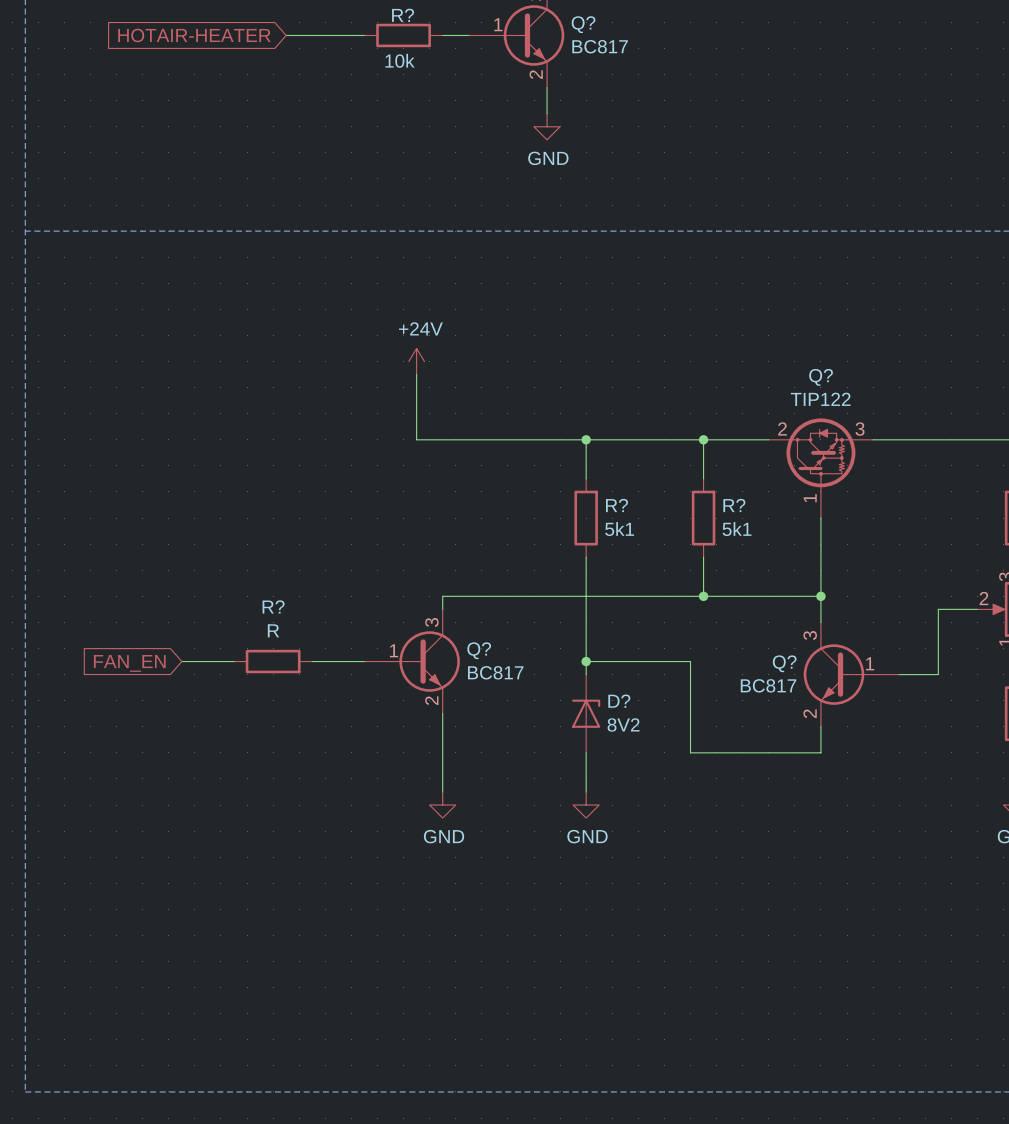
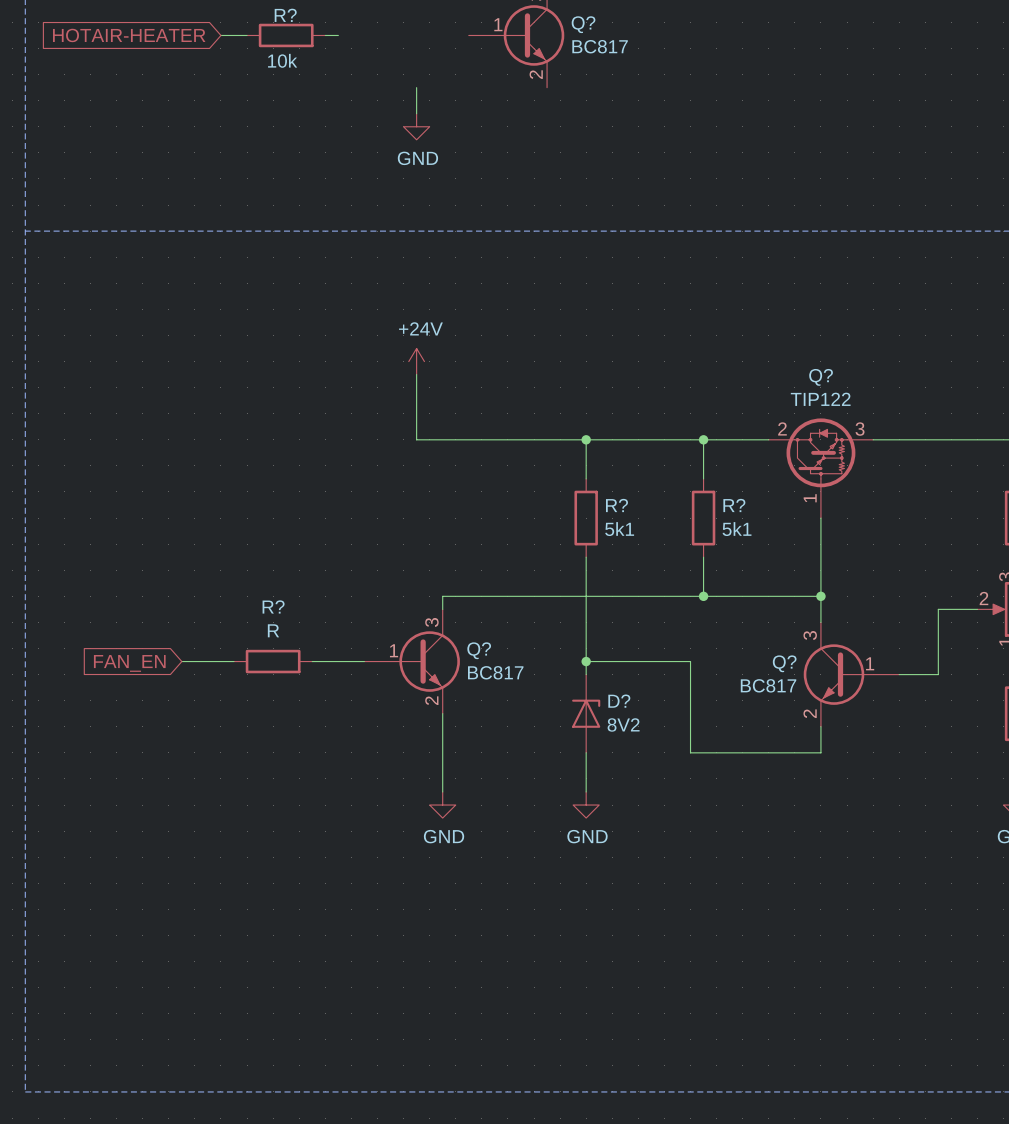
global label position: HOTAIR-HEATER (194, 35) -> HOTAIR-HEATER (129, 35)
wire: (286, 35) (325, 35) -> none
wire: (338, 35) (364, 35) -> (220, 35) (247, 35)
R? position: (403, 35) -> (286, 35)
wire: (442, 35) (468, 35) -> none
wire: (547, 87) (547, 113) -> (416, 87) (416, 113)
power symbol position: GND (547, 126) -> GND (416, 126)

